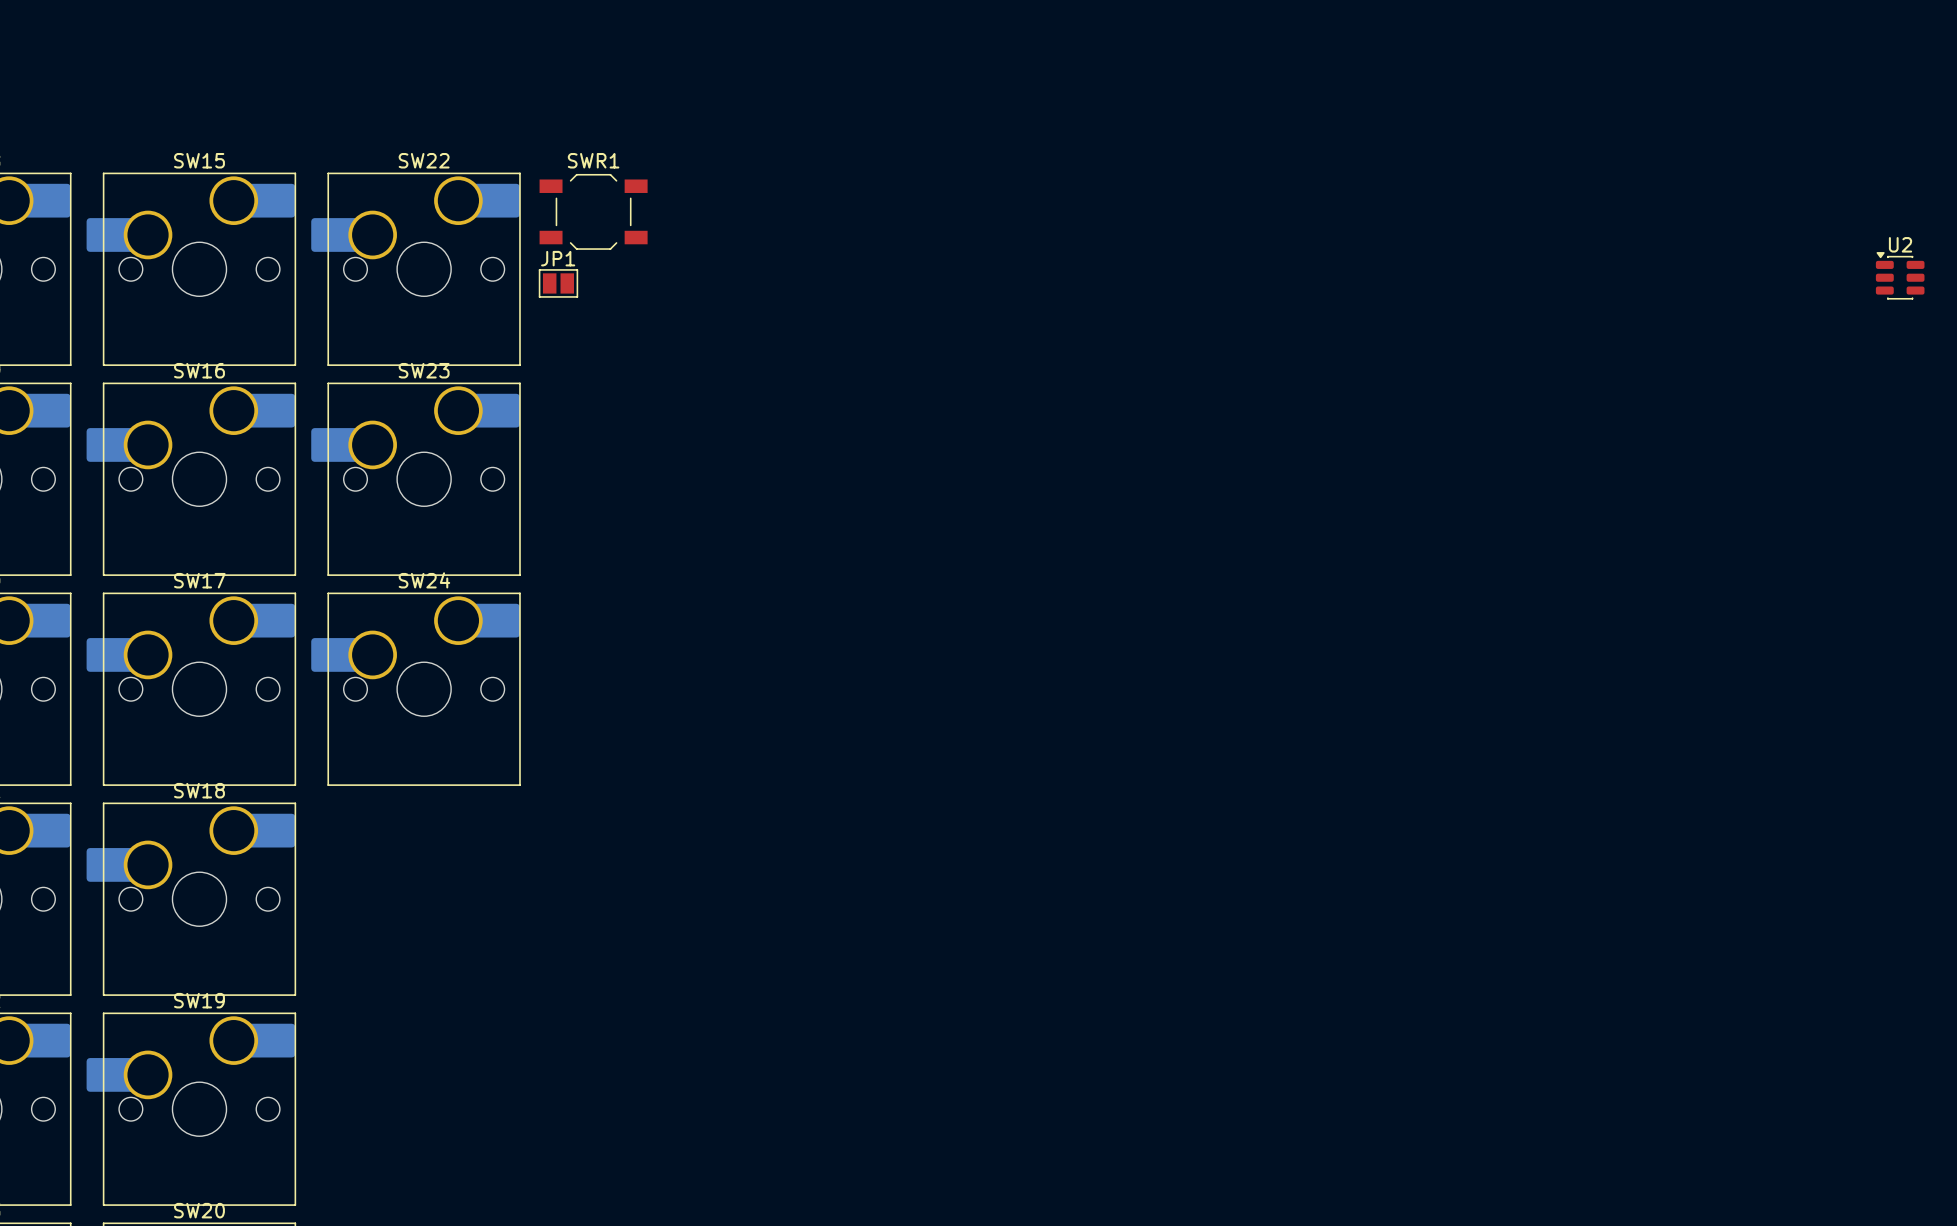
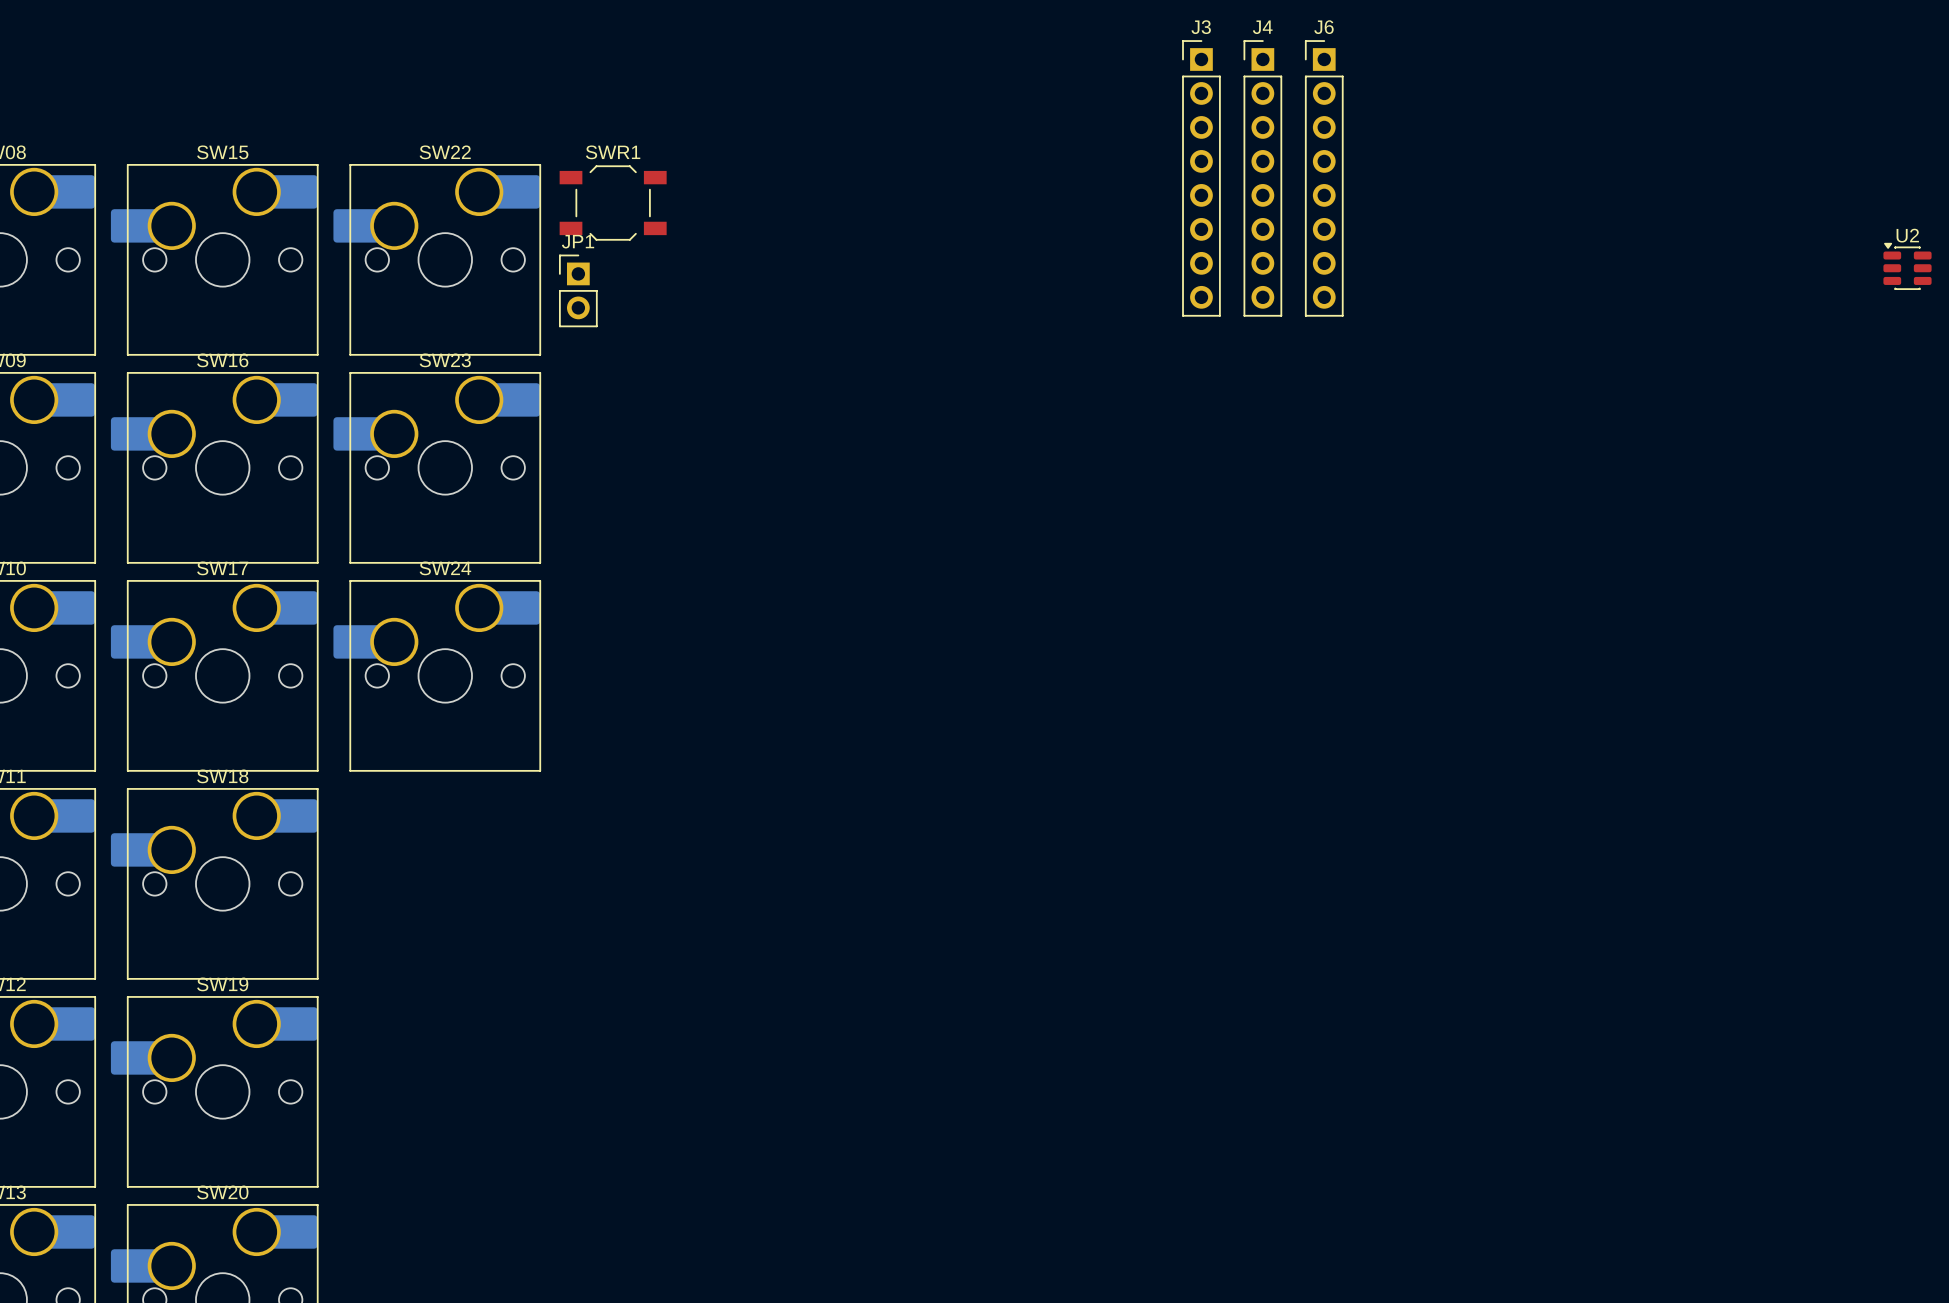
J3: none -> (1201, 178)
J4: none -> (1262, 178)
J6: none -> (1324, 178)
JP1 footprint: [538, 269, 579, 298] -> [559, 254, 598, 328]

